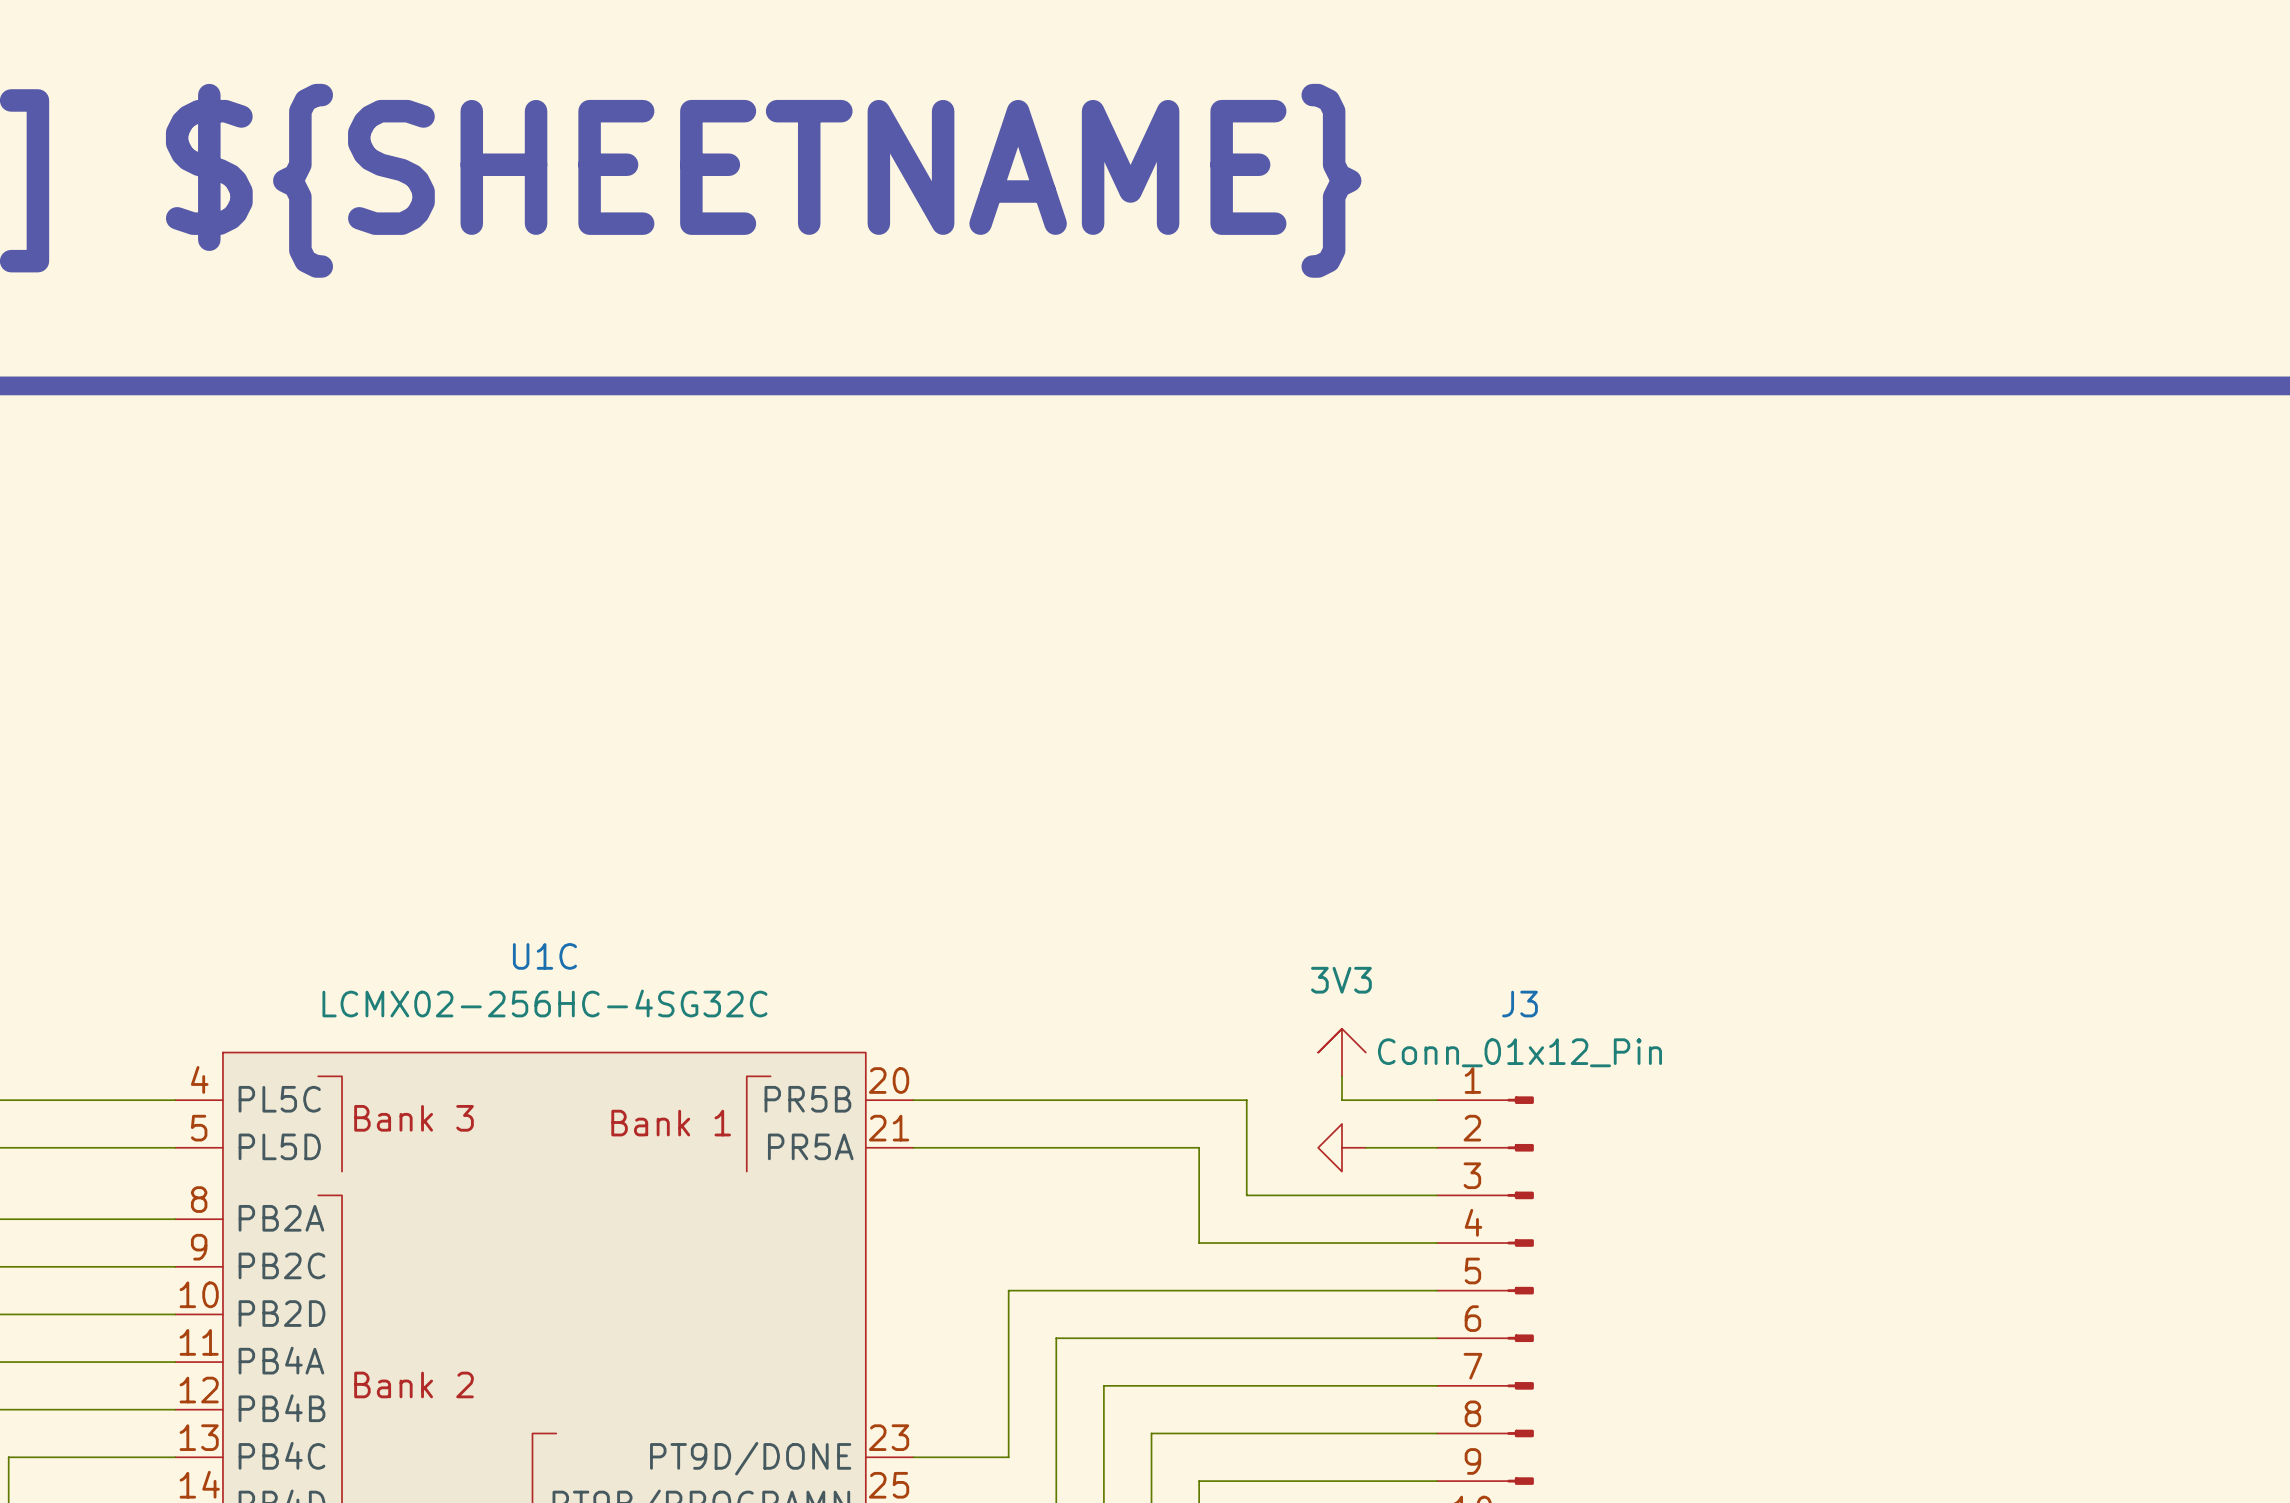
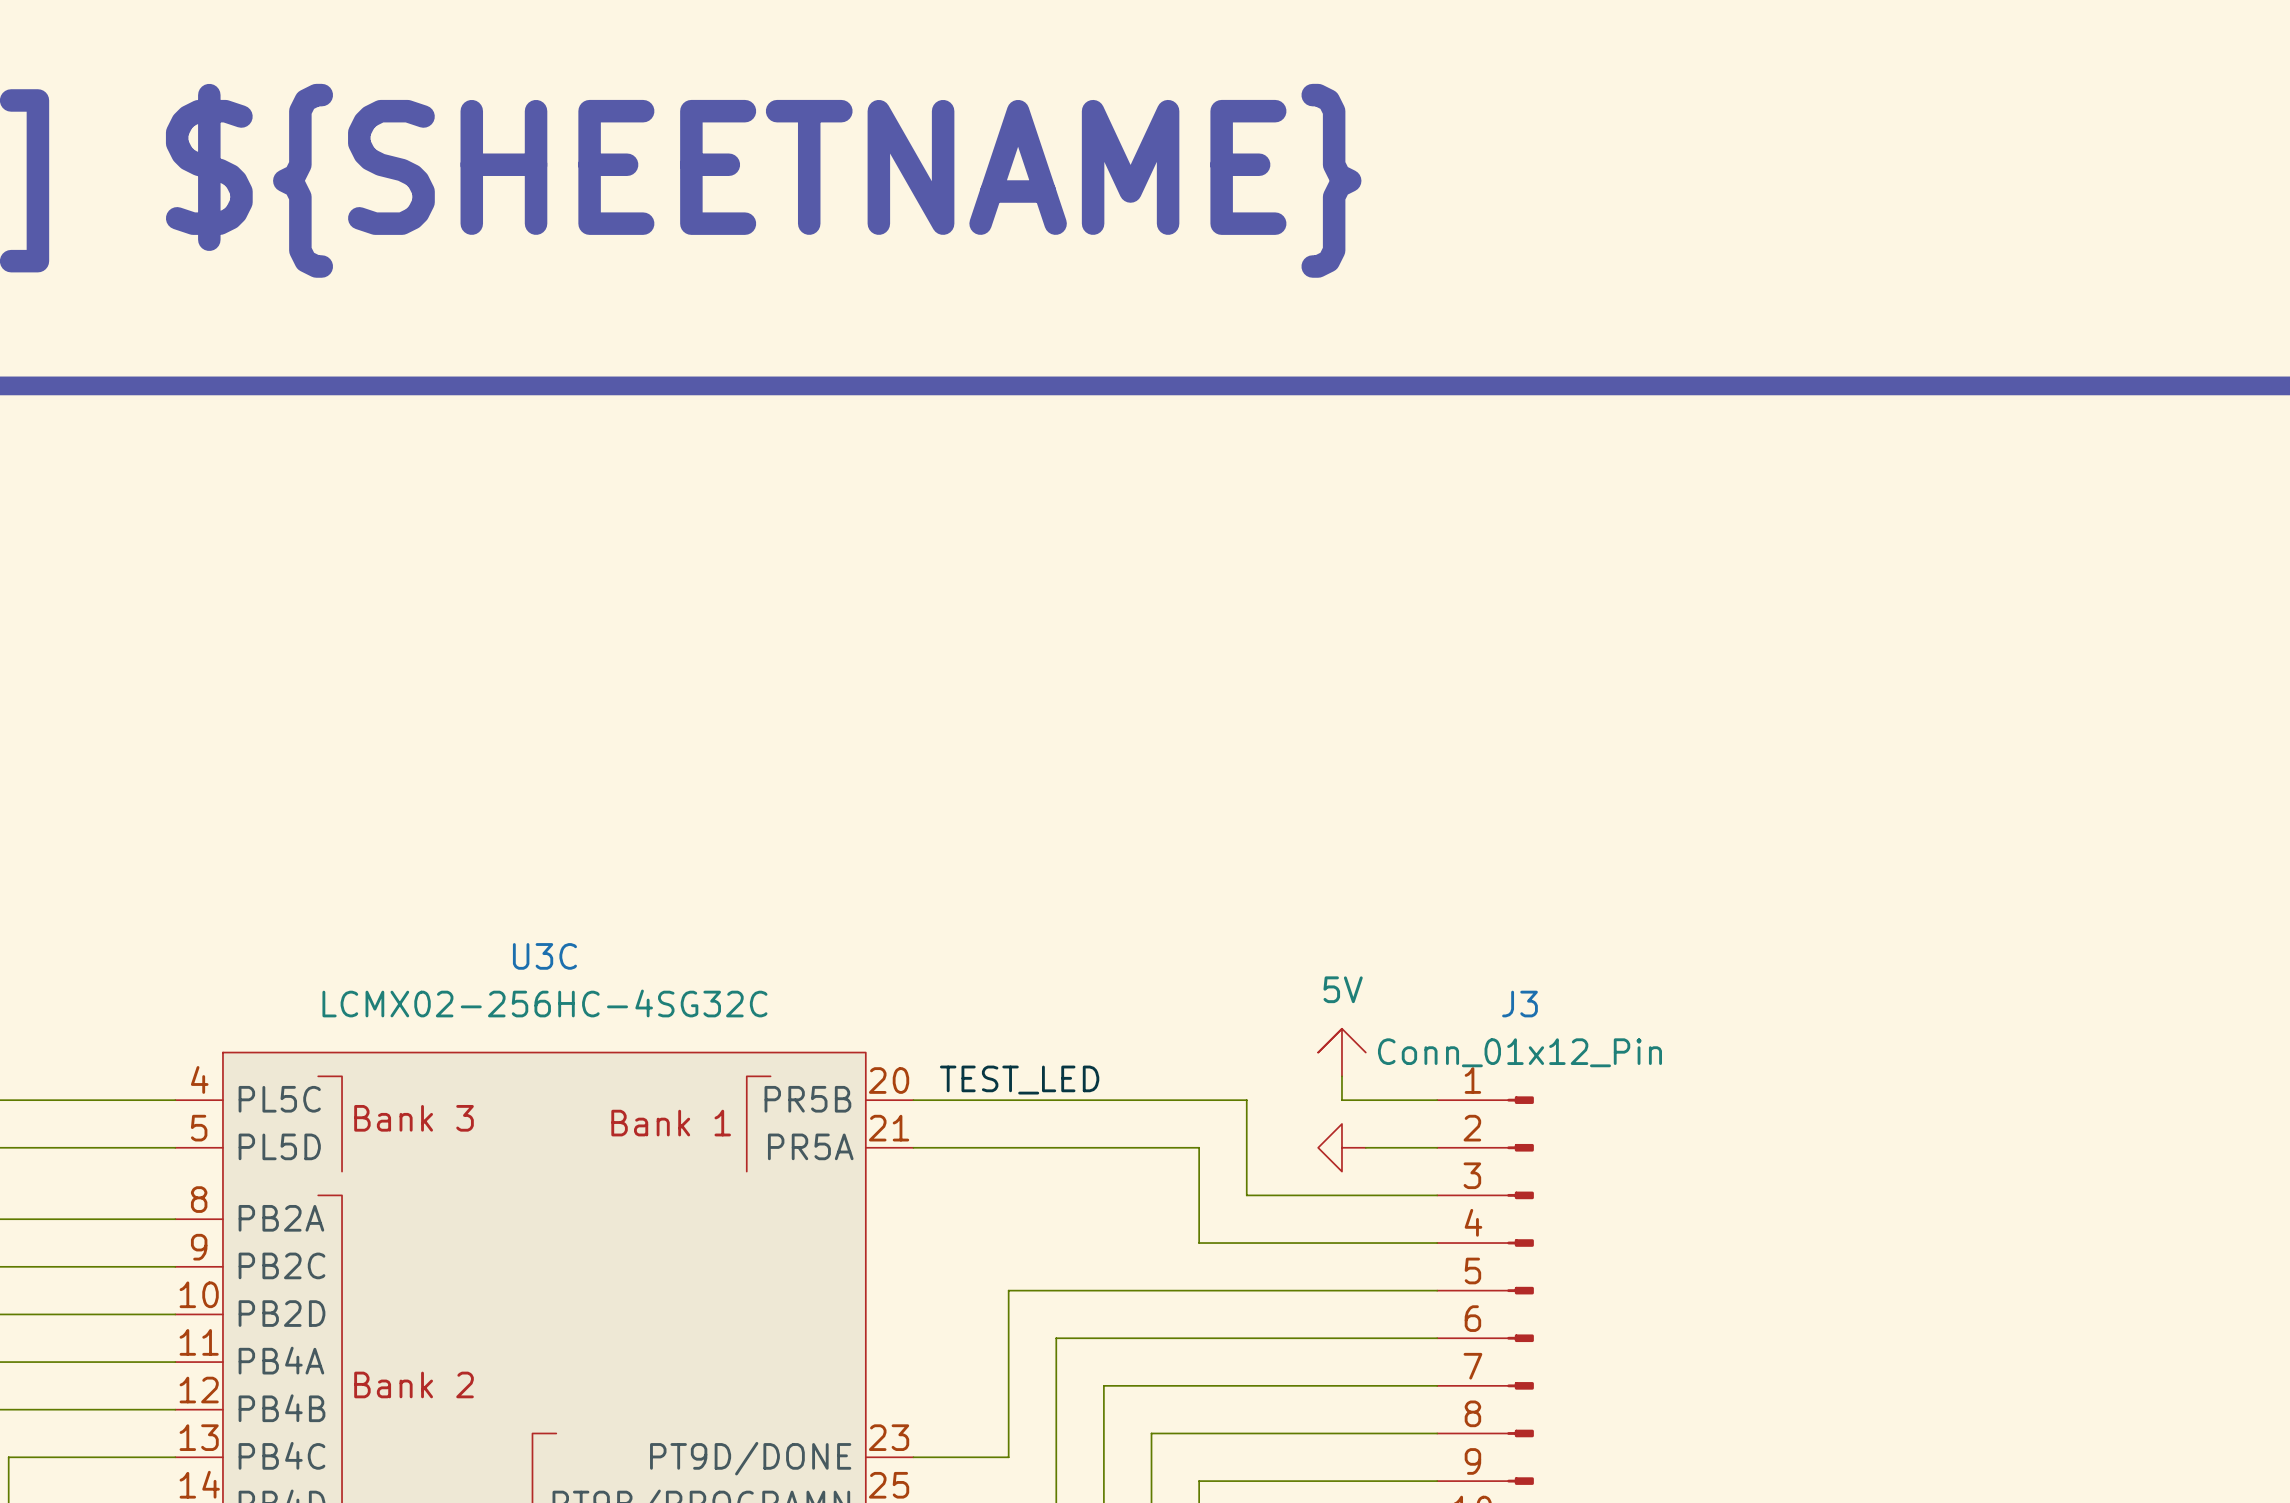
U1C name: U1C (544, 956) -> U3C (544, 956)
power symbol: 3V3 (1341, 1052) -> 5V (1341, 1052)
label: none -> TEST_LED (1019, 1080)

